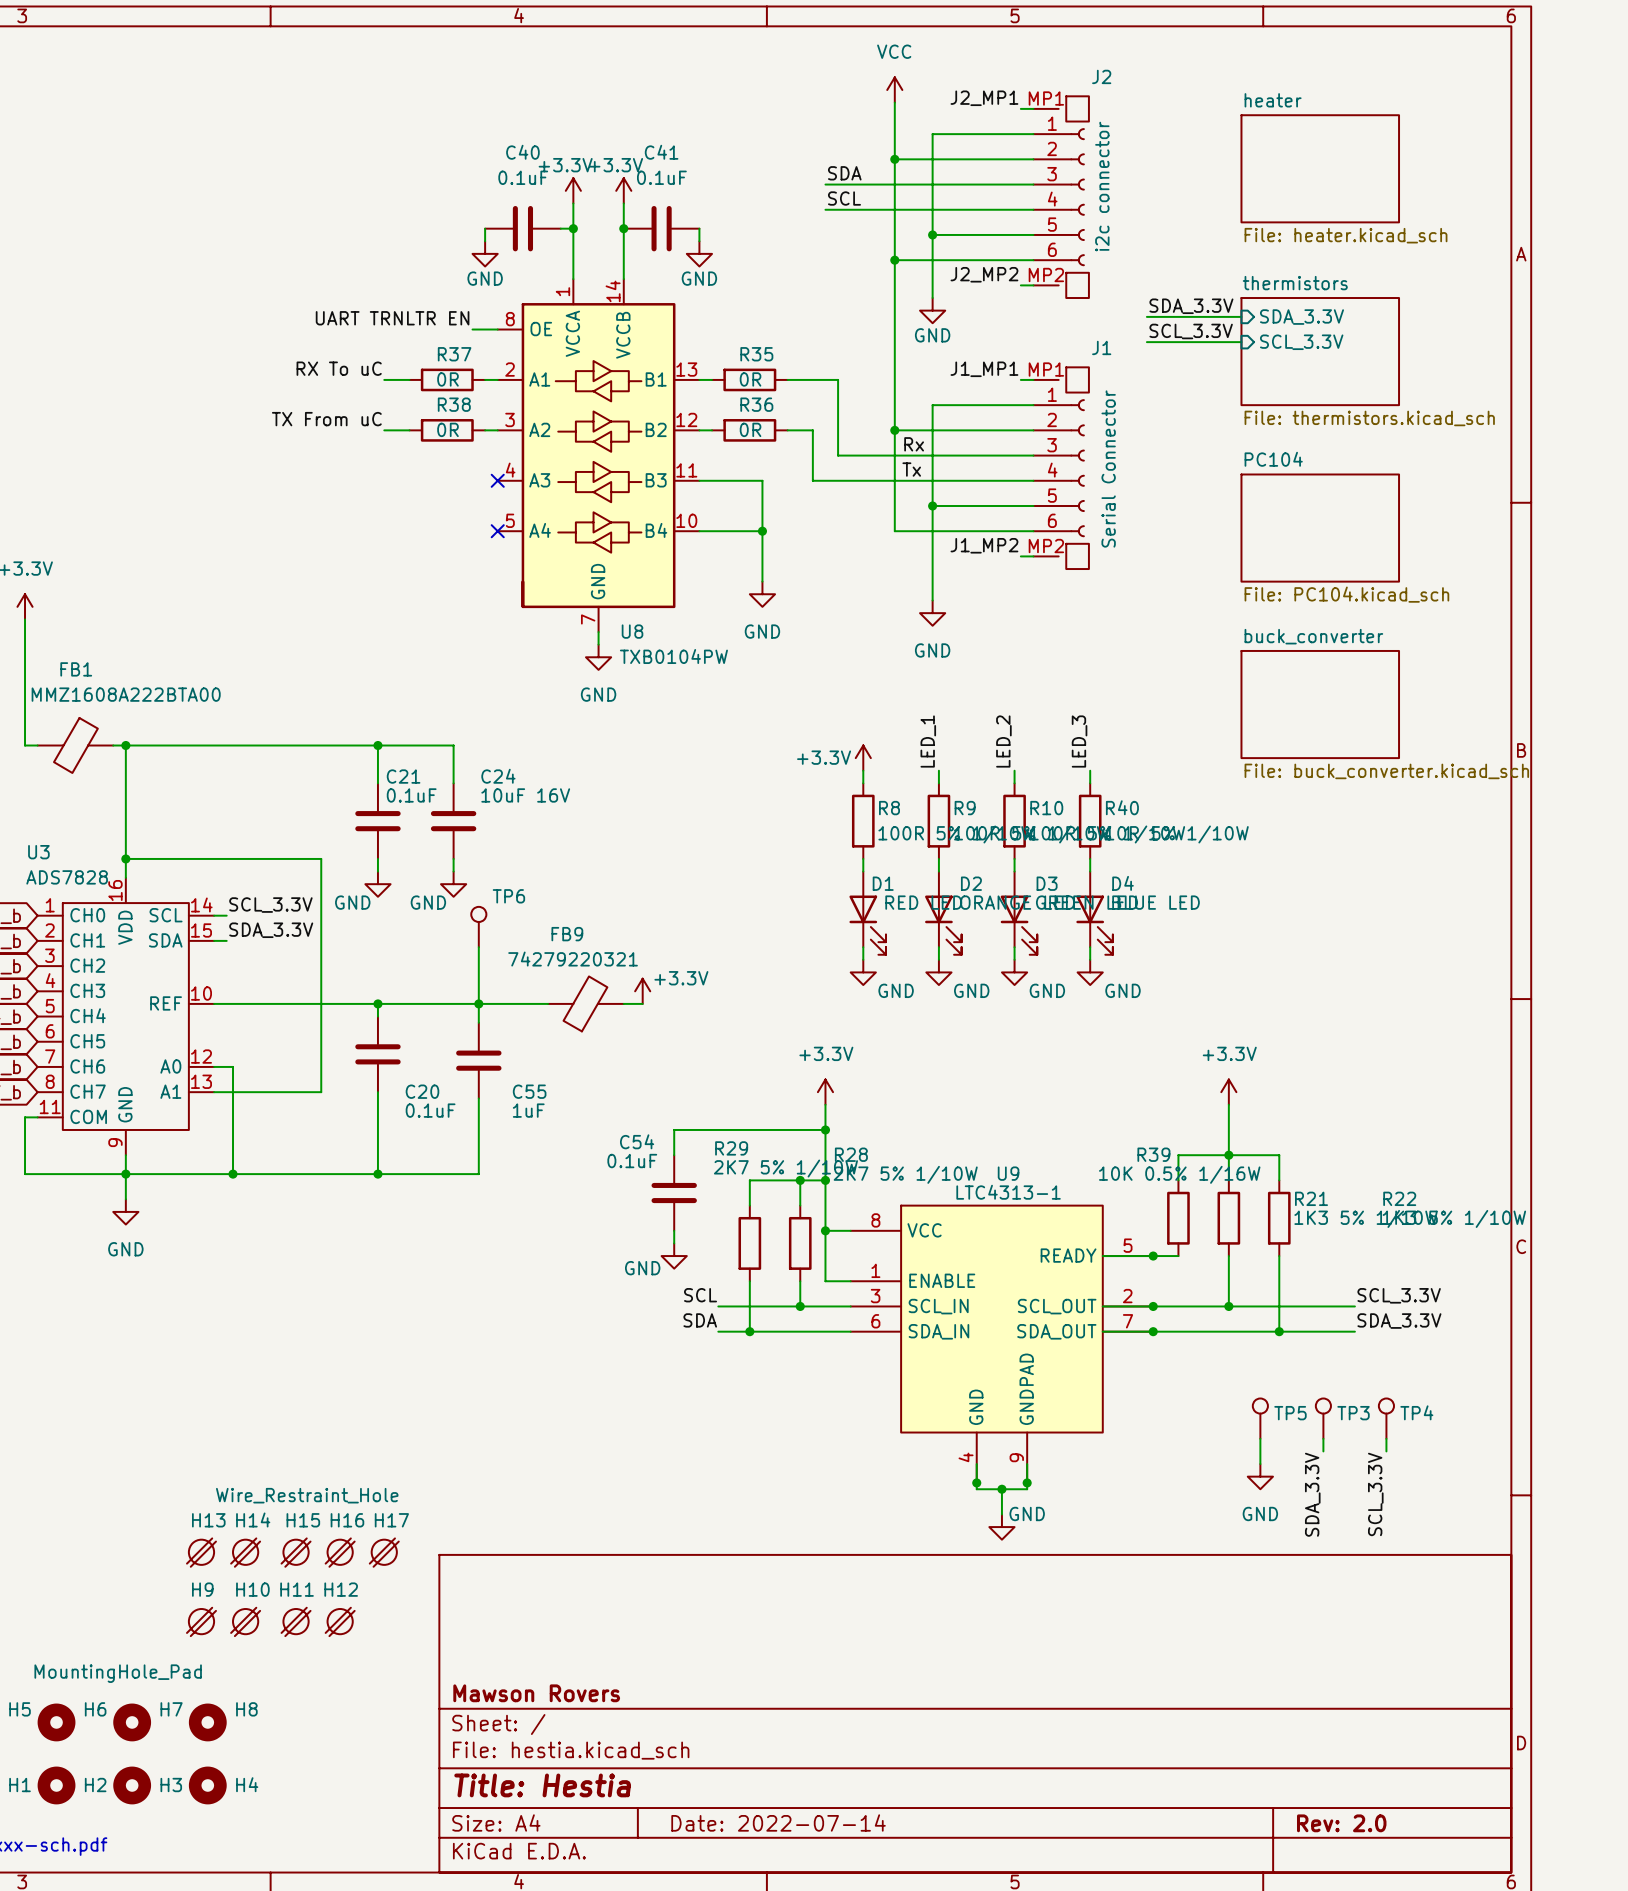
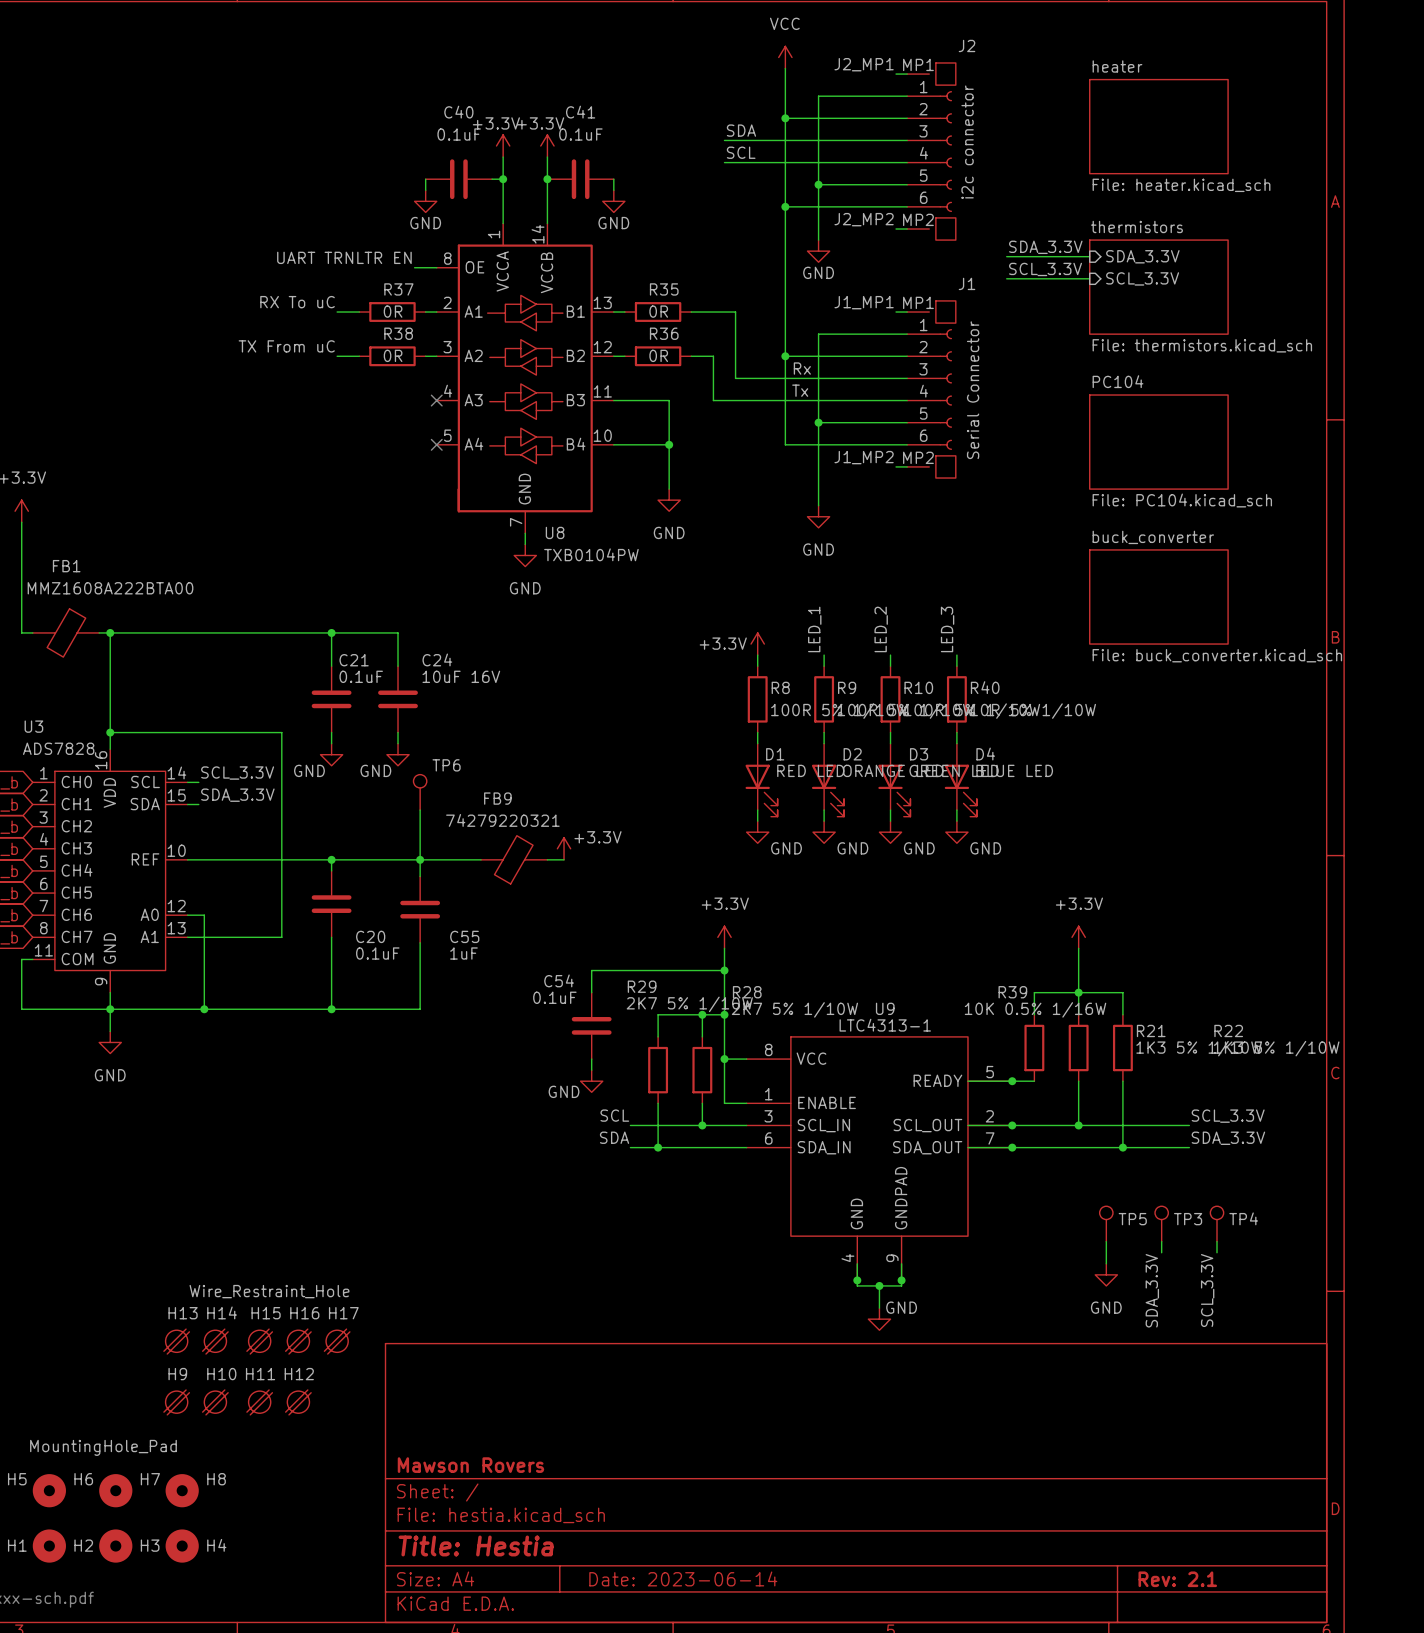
title block: Date: 2022-07-14 (778, 1822) -> Date: 2023-06-14 (683, 1578)
title block: Rev: 2.0 (1341, 1823) -> Rev: 2.1 (1177, 1579)

